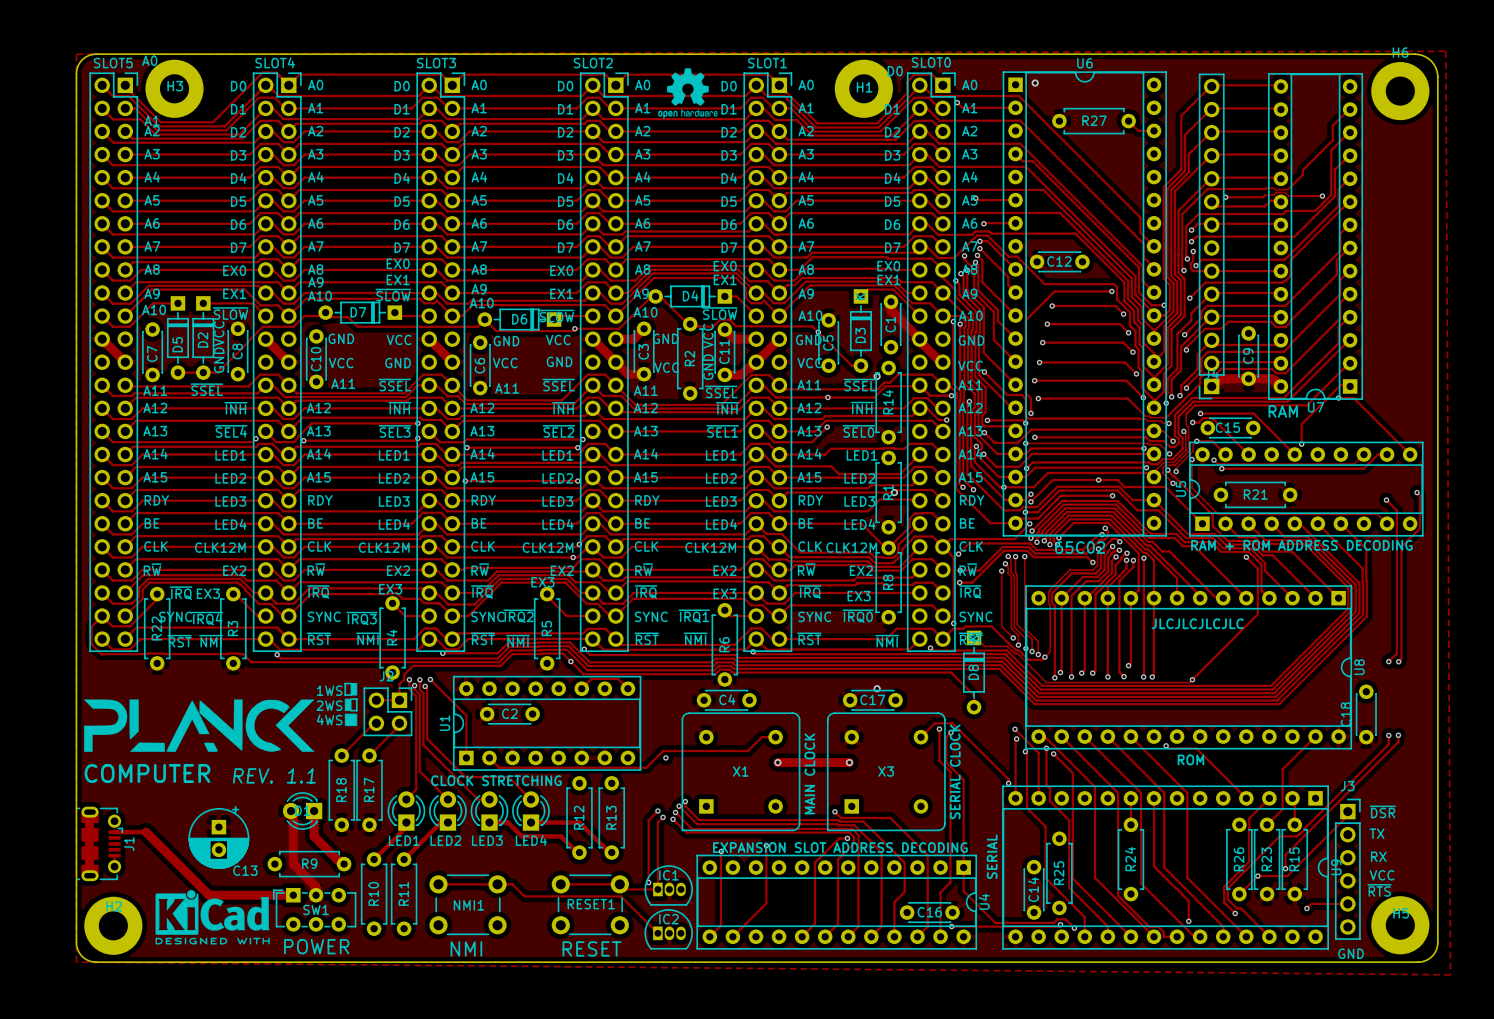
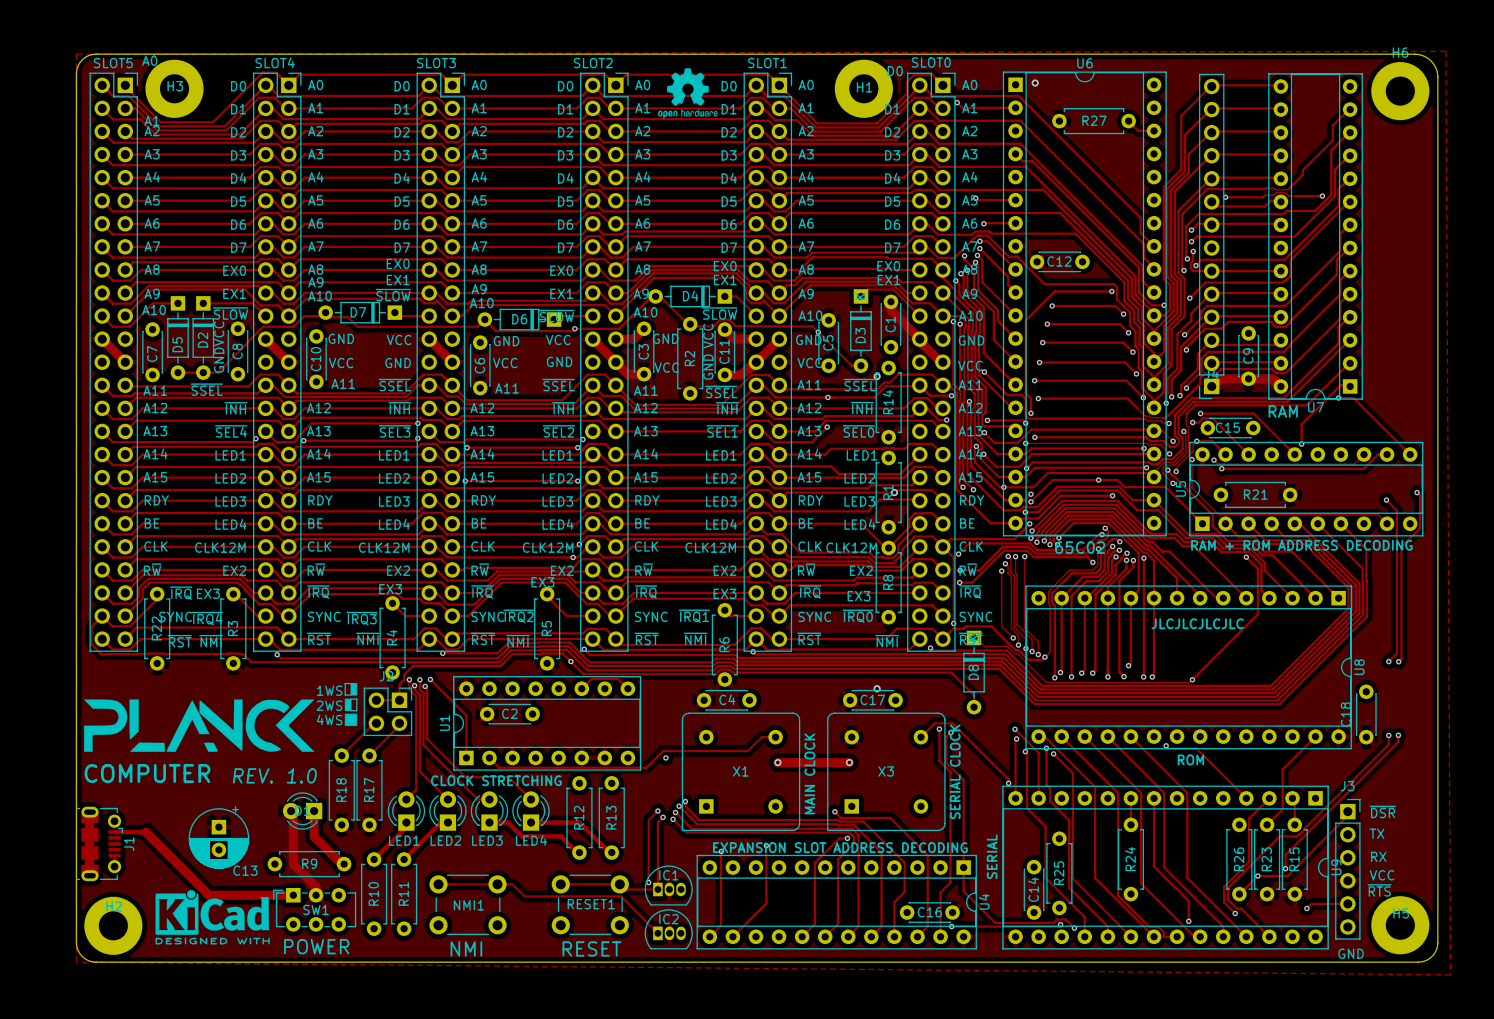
text: REV. 1.1 (274, 775) -> REV. 1.0 (274, 775)

